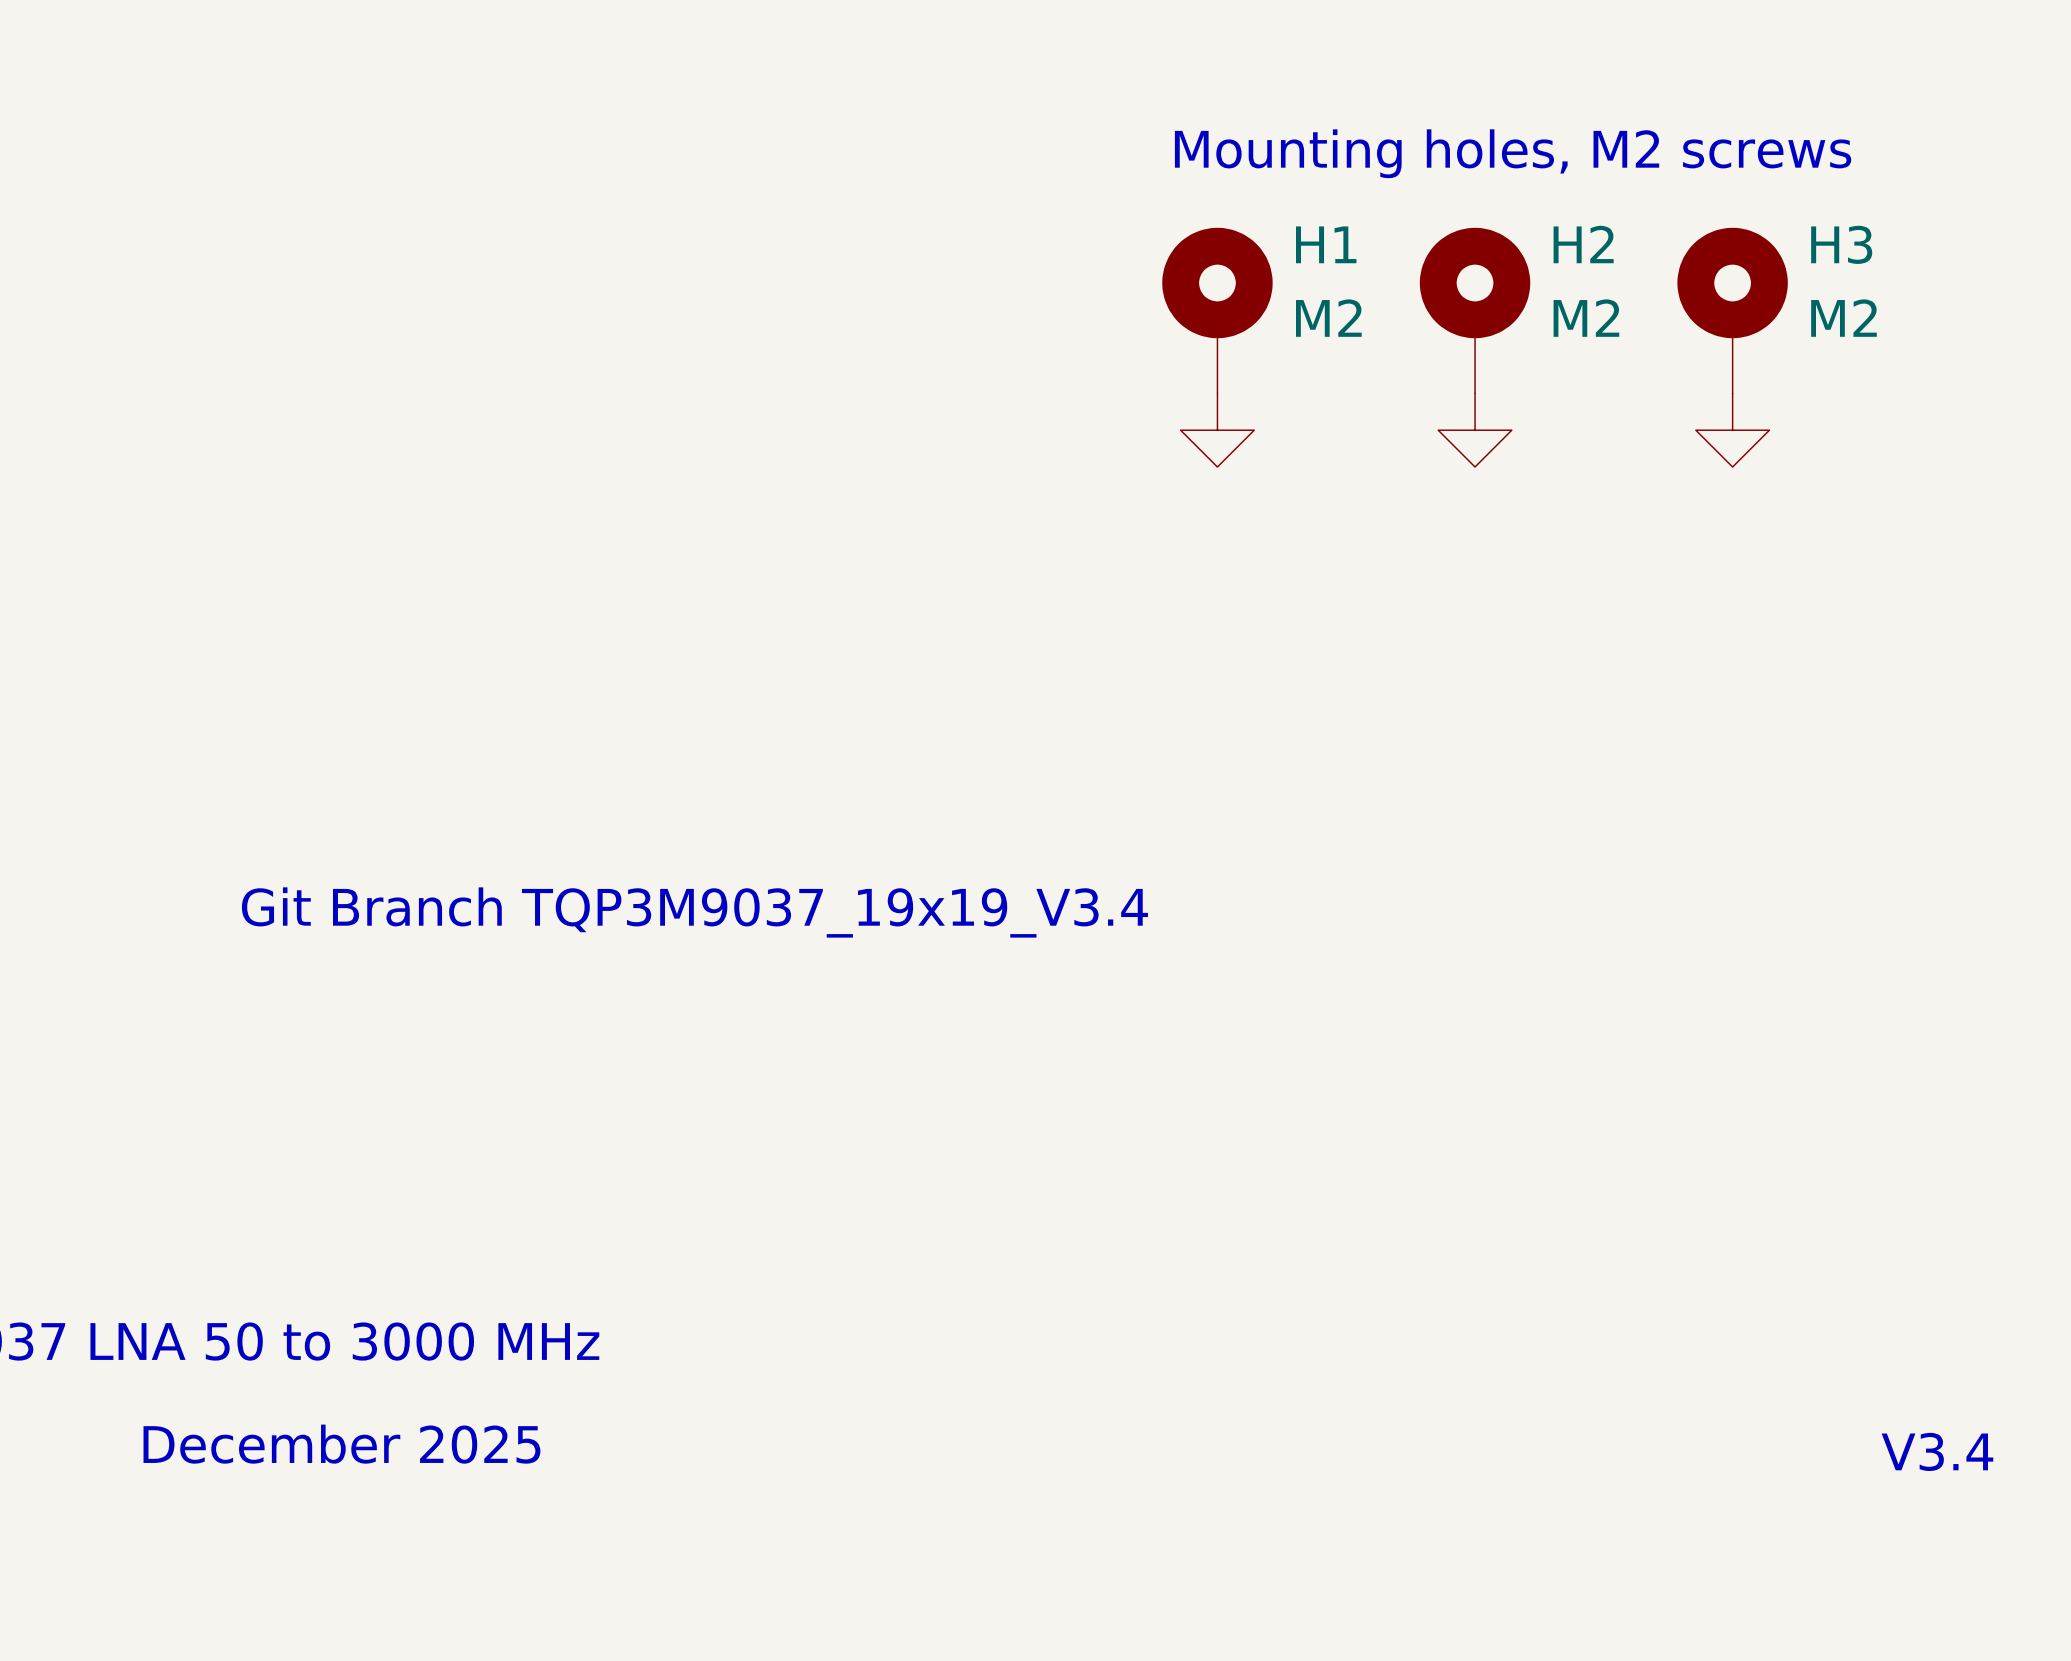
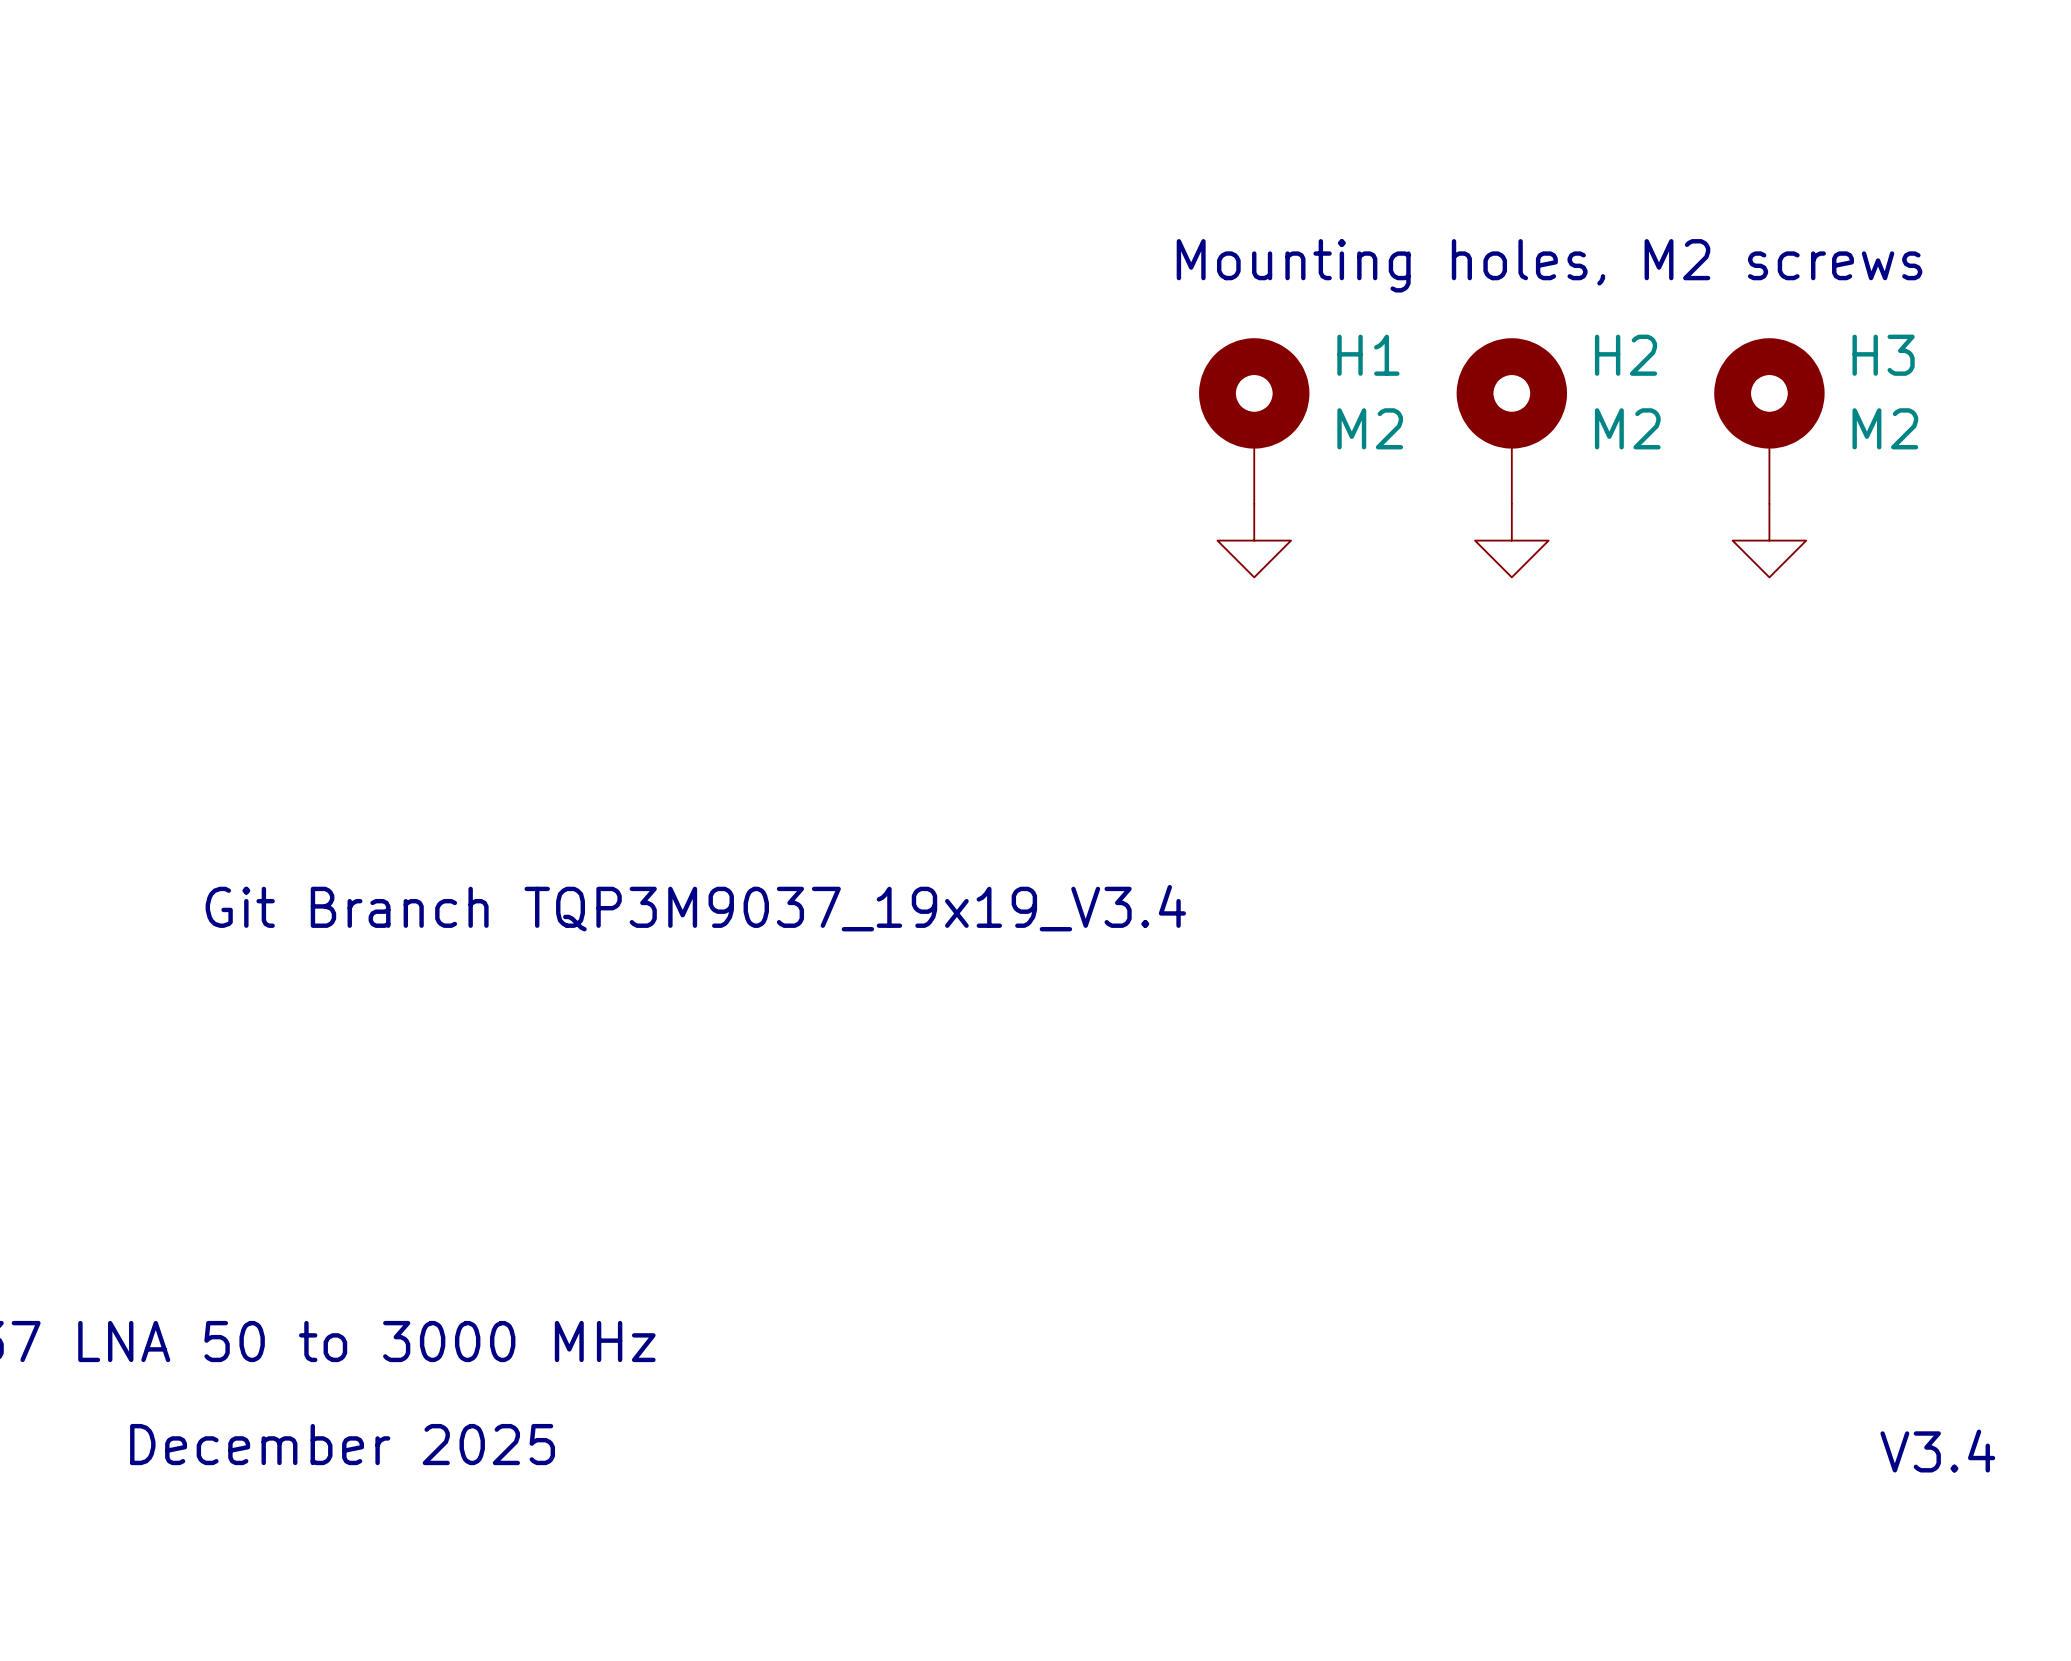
text position: Mounting holes, M2 screws (1513, 153) -> Mounting holes, M2 screws (1549, 265)
H1 position: (1217, 310) -> (1254, 421)
H2 position: (1475, 310) -> (1511, 421)
H3 position: (1732, 310) -> (1769, 421)
power symbol position: (1217, 430) -> (1254, 540)
power symbol position: (1475, 430) -> (1511, 540)
power symbol position: (1732, 430) -> (1769, 540)

